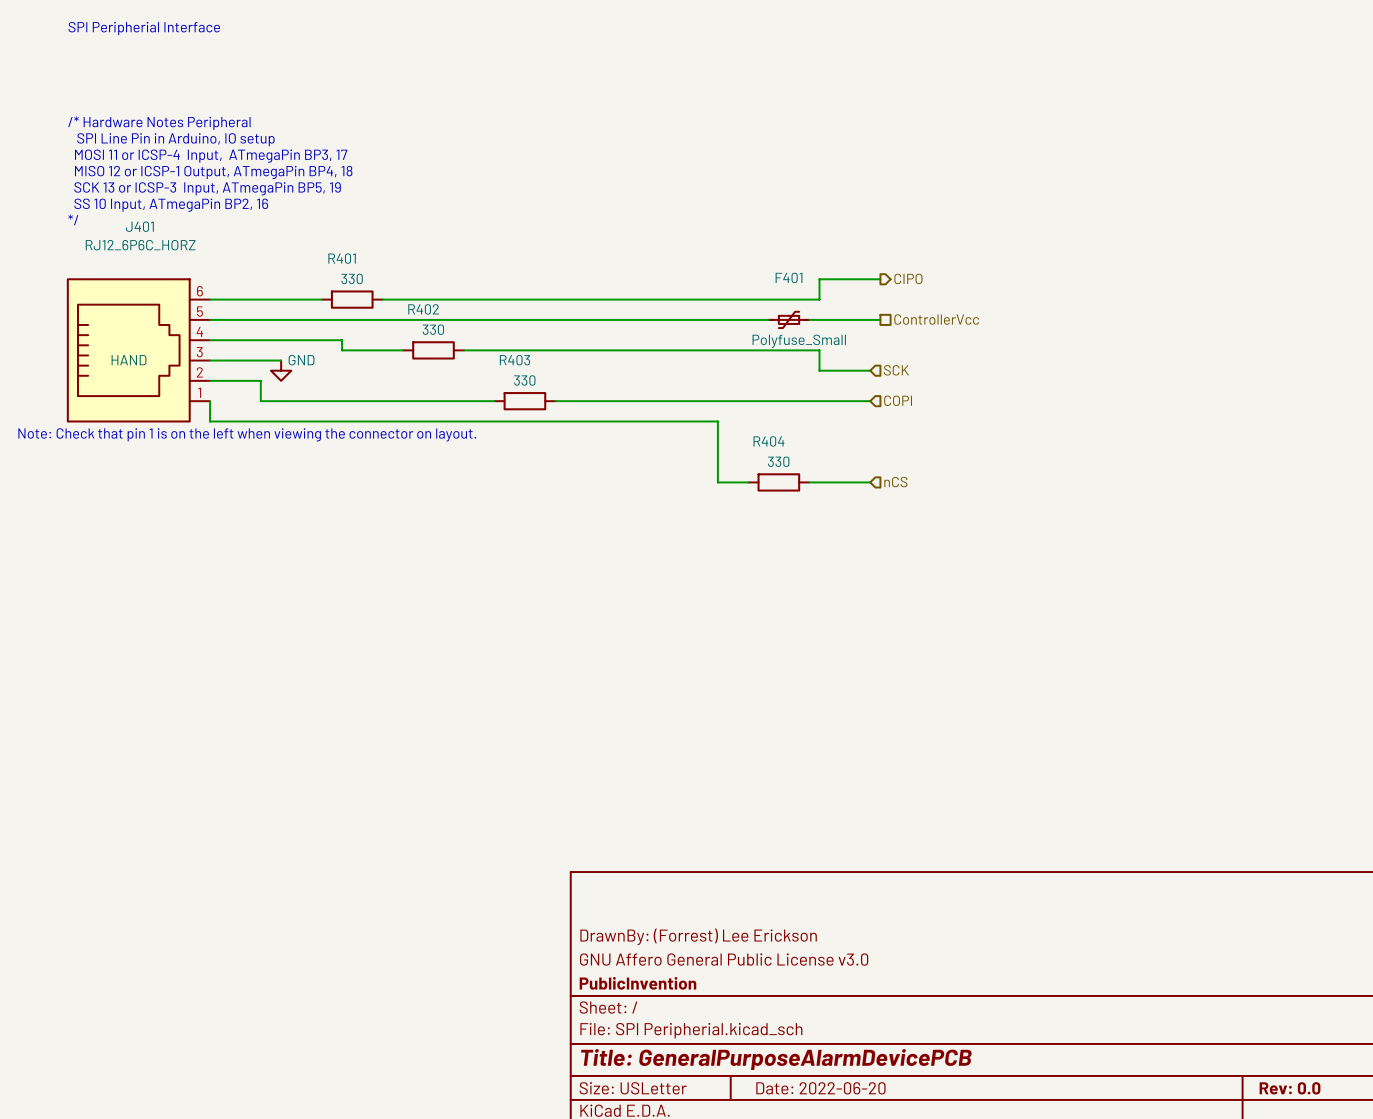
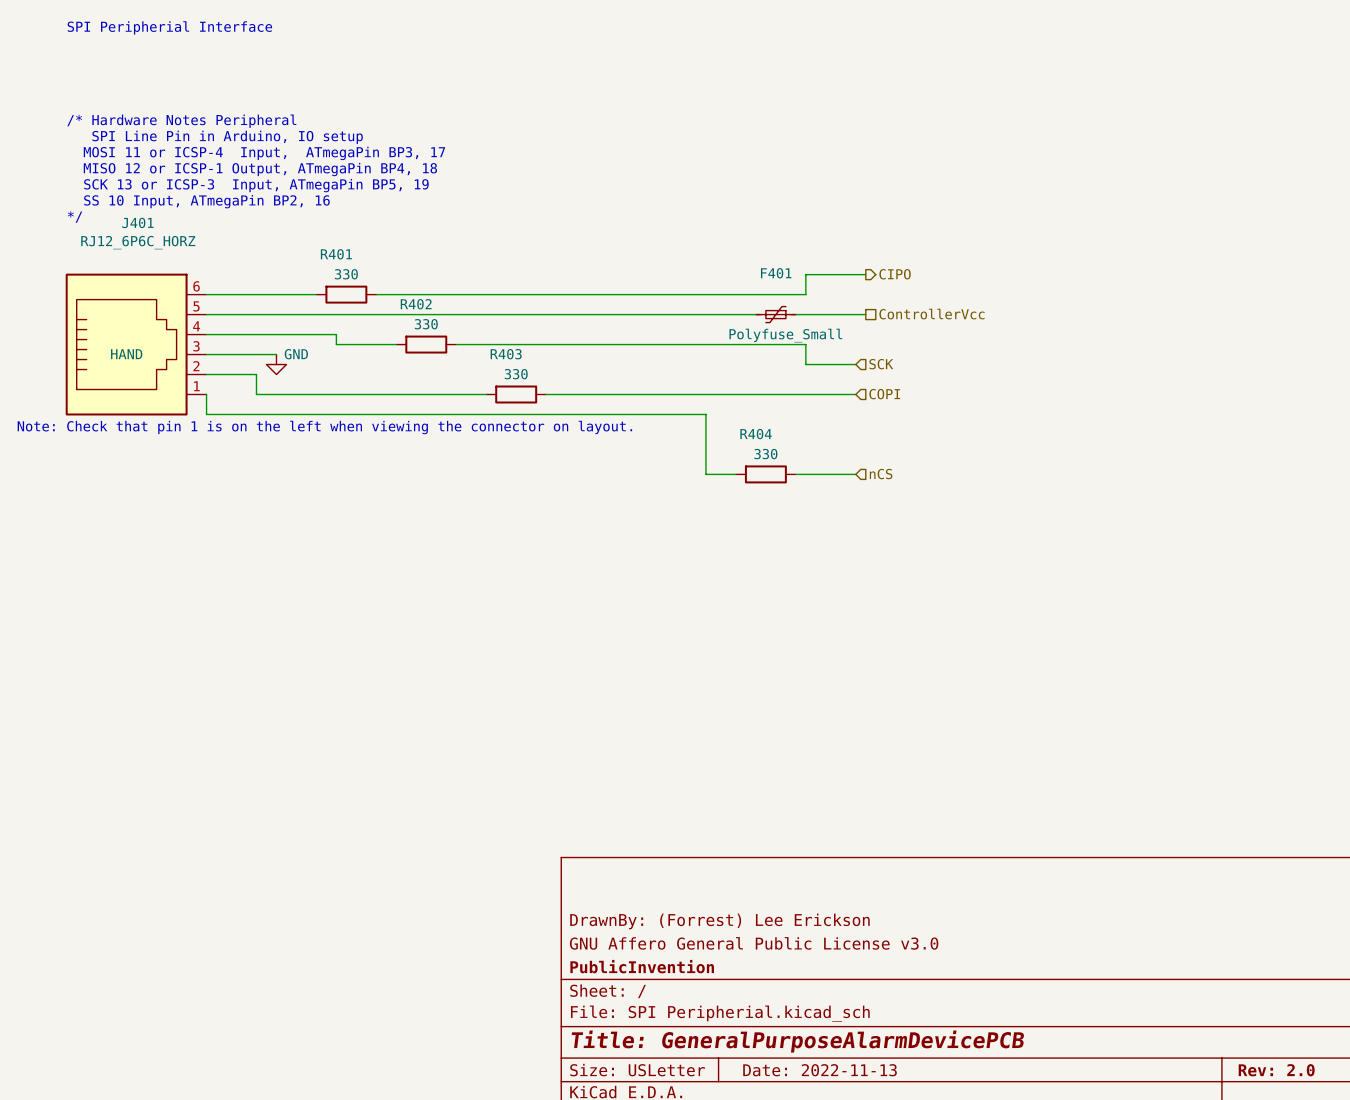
title block: Date: 2022-06-20 (820, 1088) -> Date: 2022-11-13 (820, 1070)
title block: Rev: 0.0 (1290, 1088) -> Rev: 2.0 (1276, 1070)

